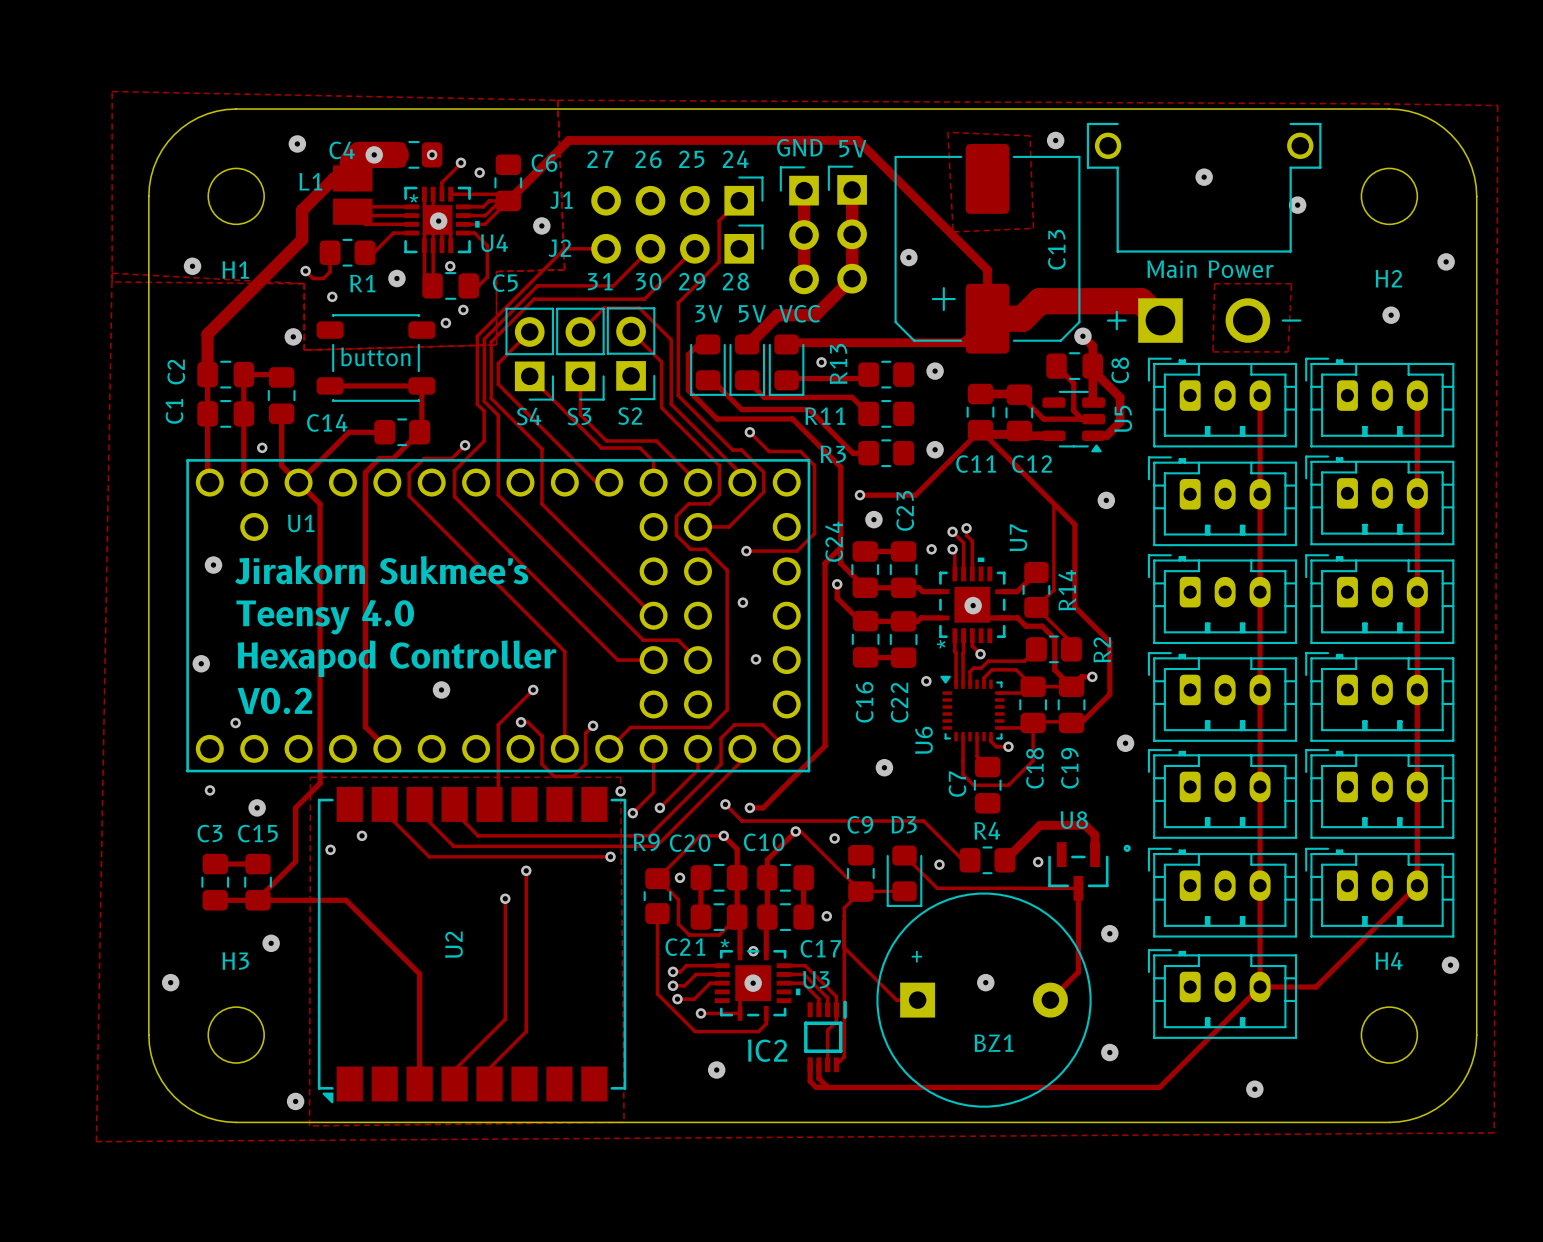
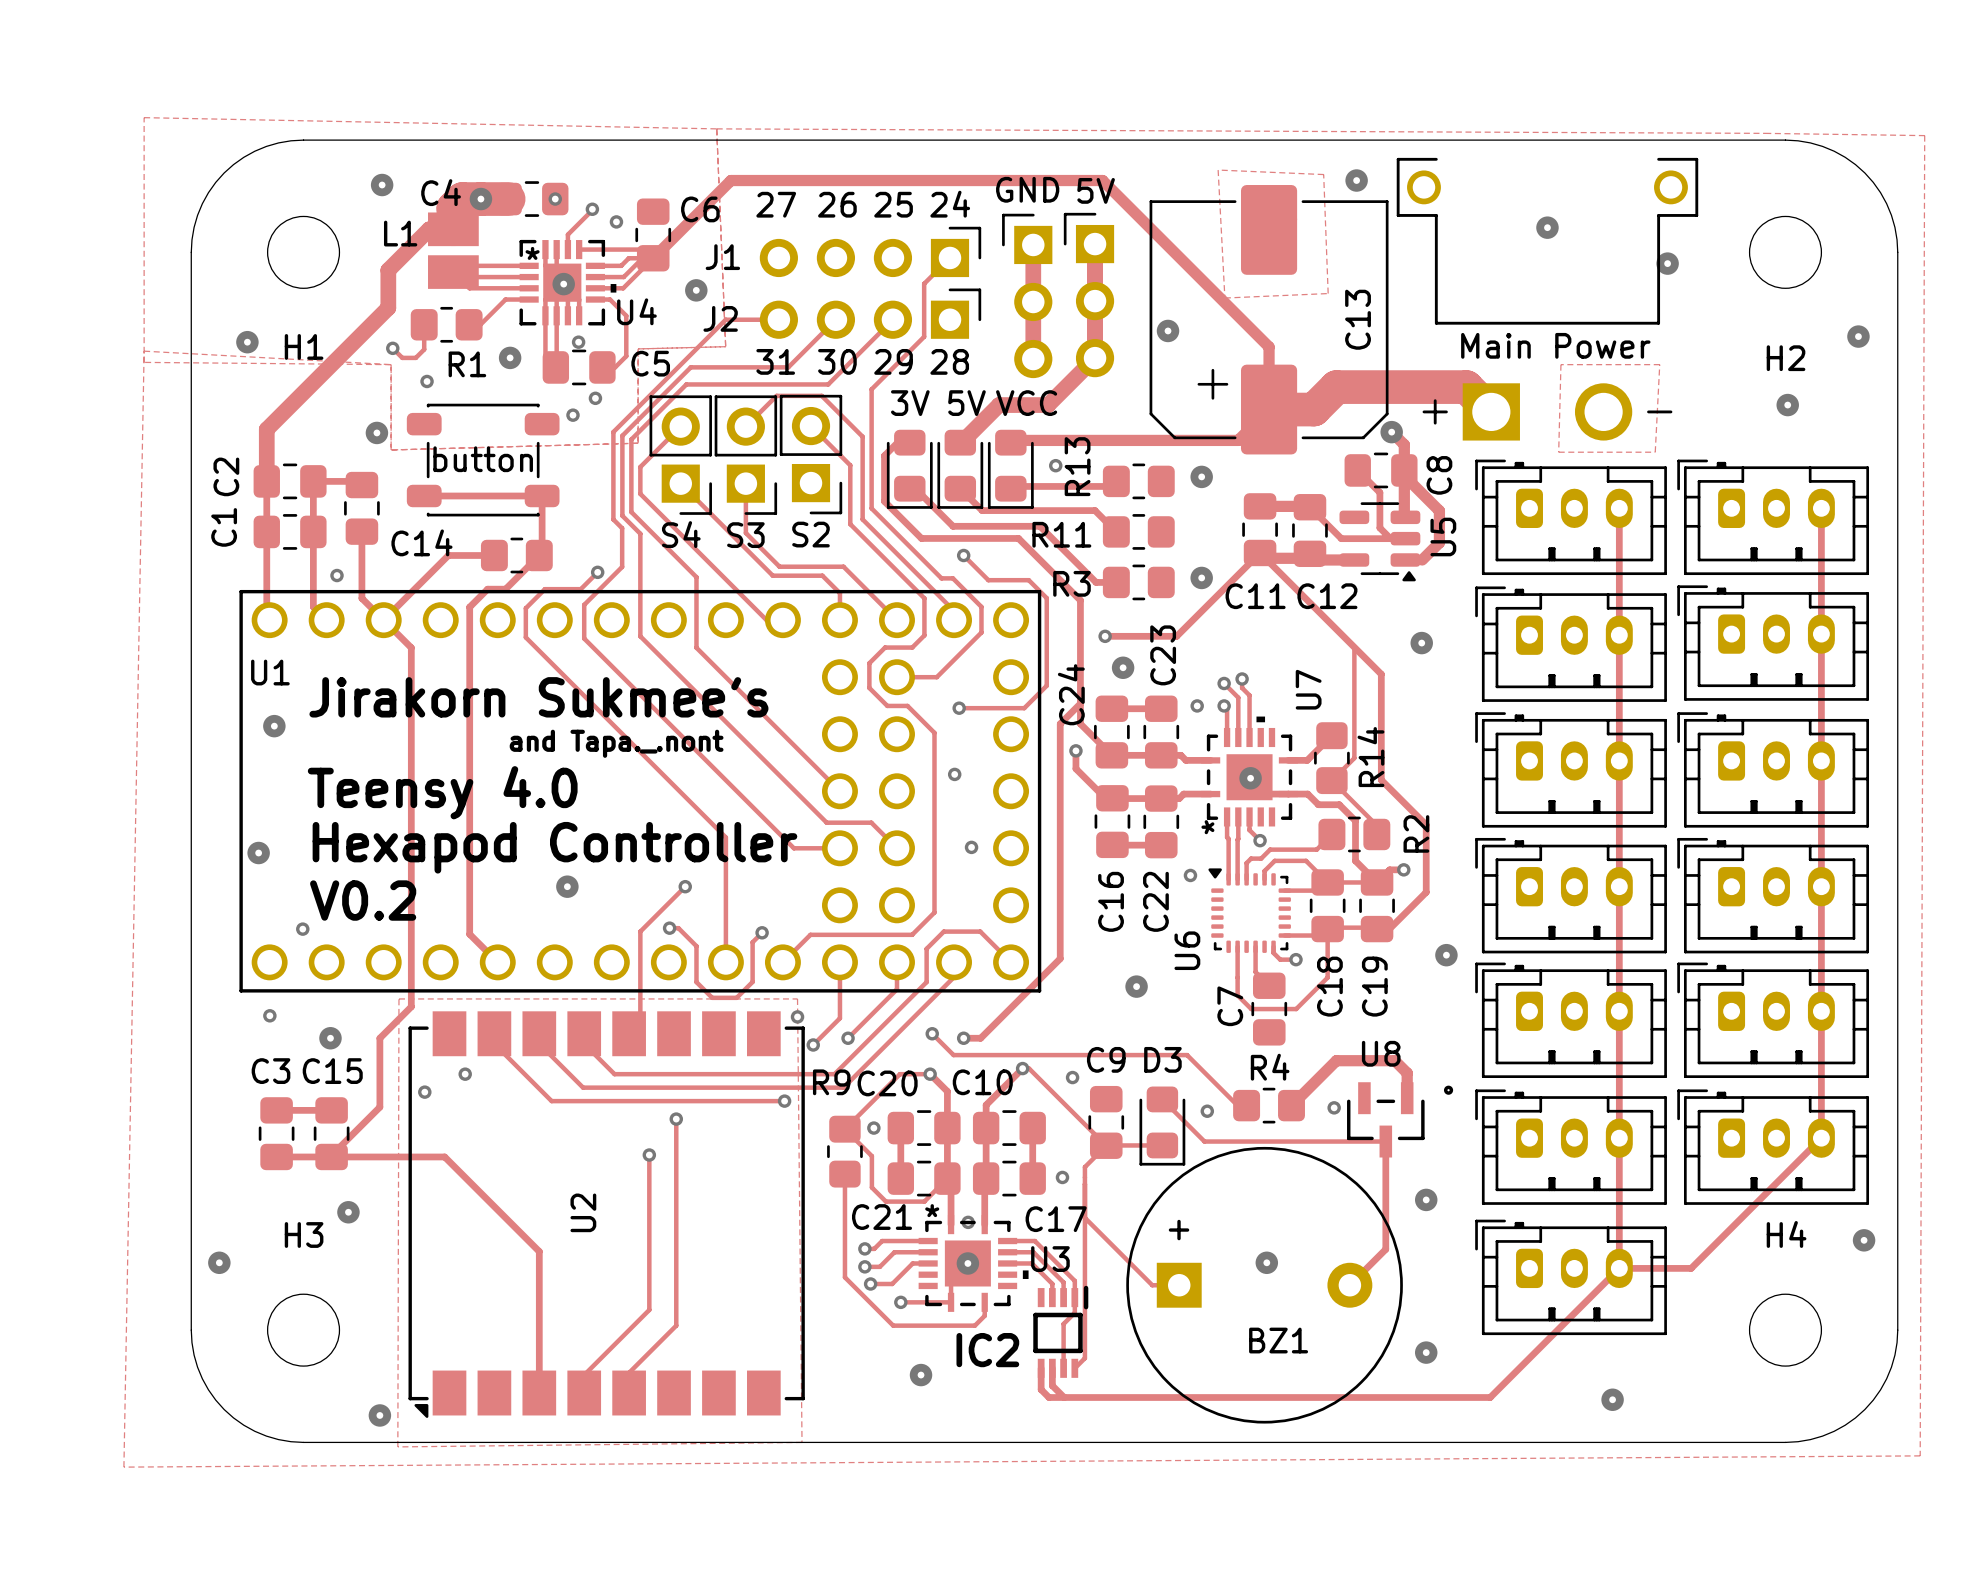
U1 footprint: [186, 459, 811, 773] -> [239, 589, 1042, 993]
U1 name position: U1 (301, 523) -> U1 (270, 672)
text position: Jirakorn Sukmee's (381, 570) -> Jirakorn Sukmee's (538, 697)
text: none -> and Tapa._.nont (616, 743)

